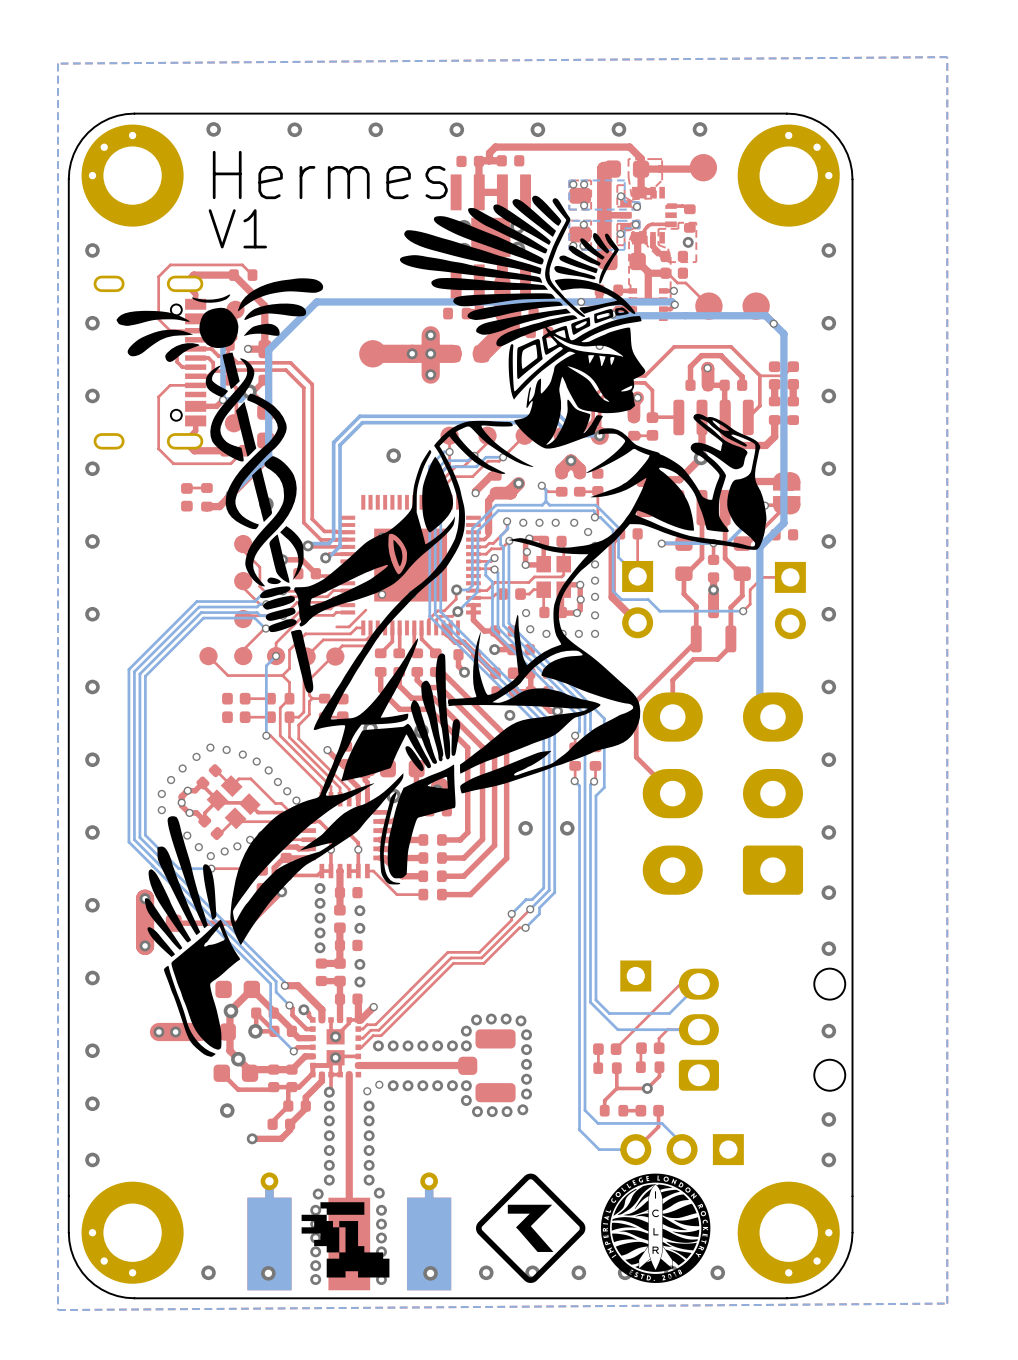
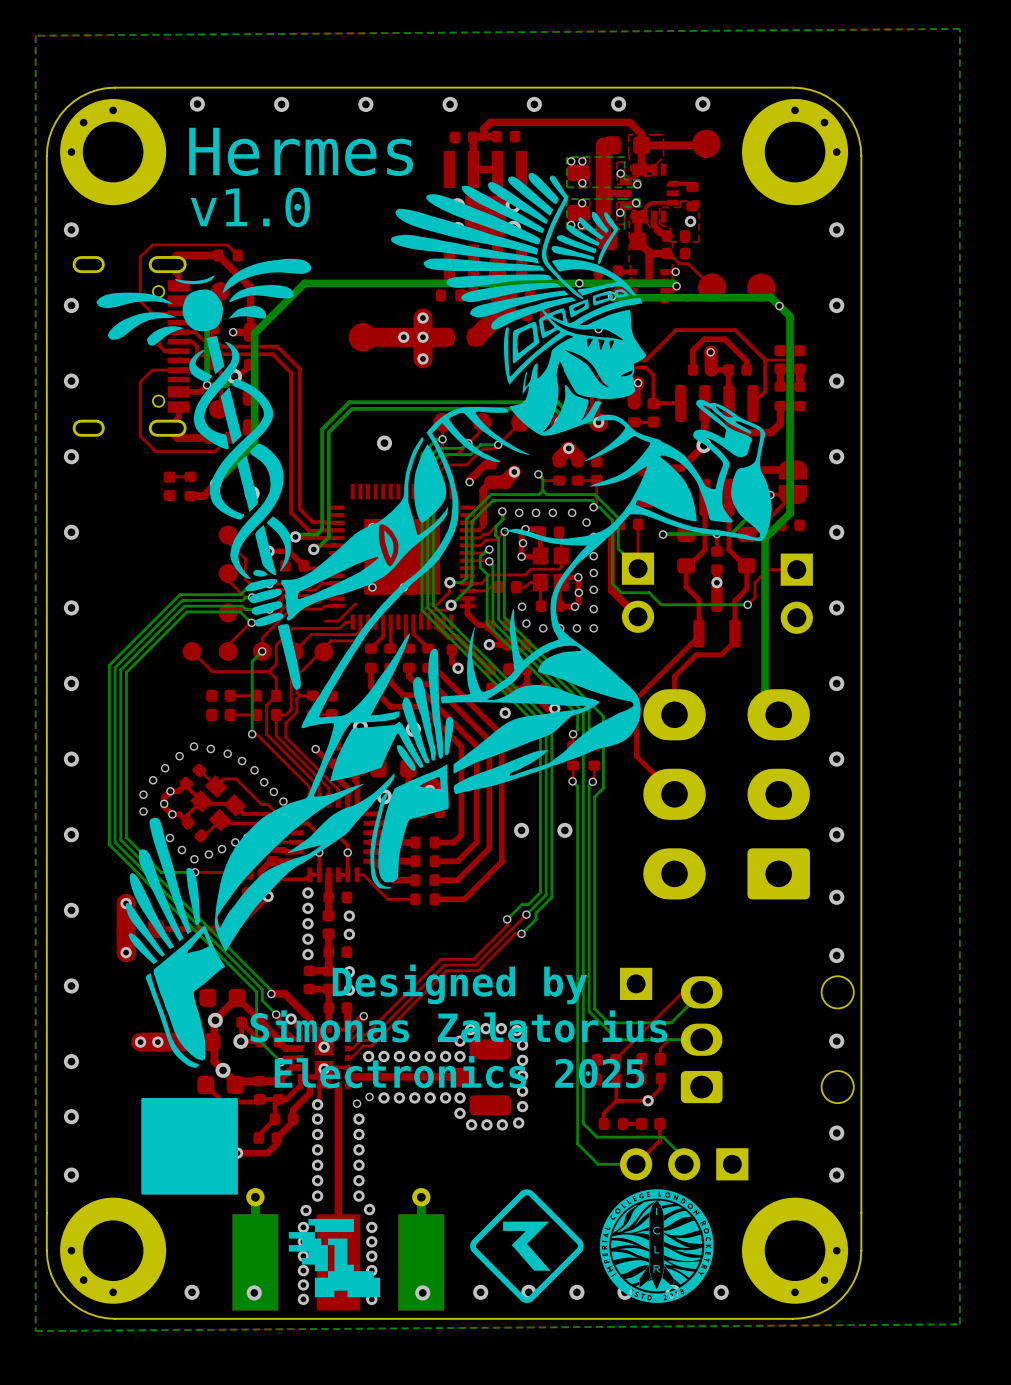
text: V1 (237, 228) -> v1.0 (250, 207)
text: none -> Designed by (459, 984)
text: none -> Simonas Zalatorius (458, 1026)
text: none -> Electronics 2025 (459, 1072)
drawing: none -> [141, 1098, 238, 1195]

